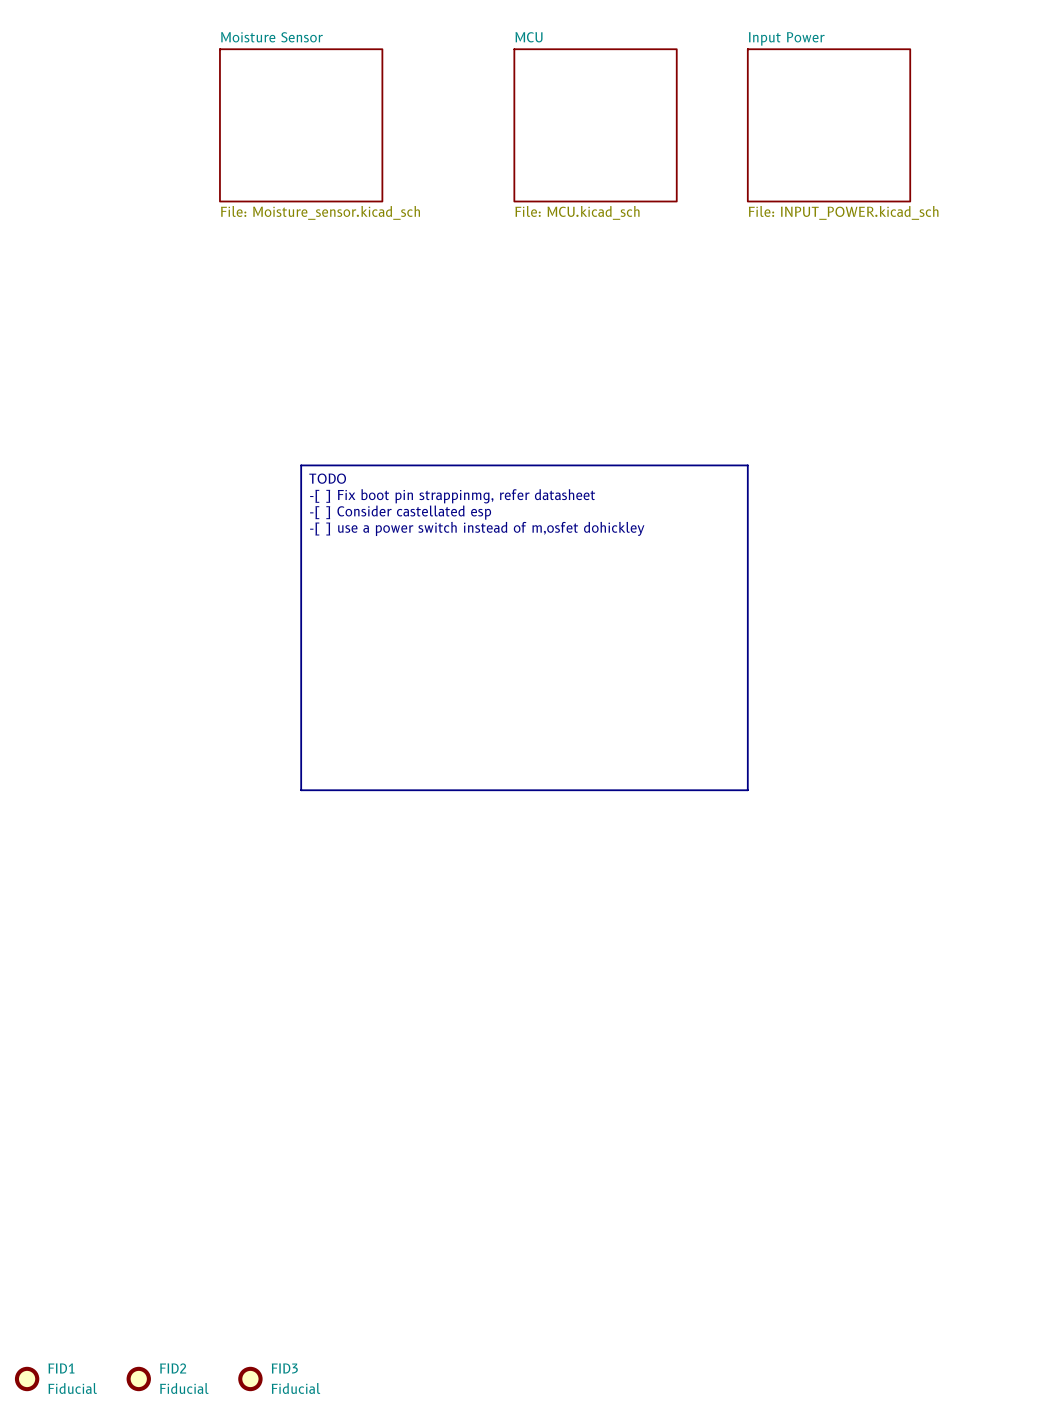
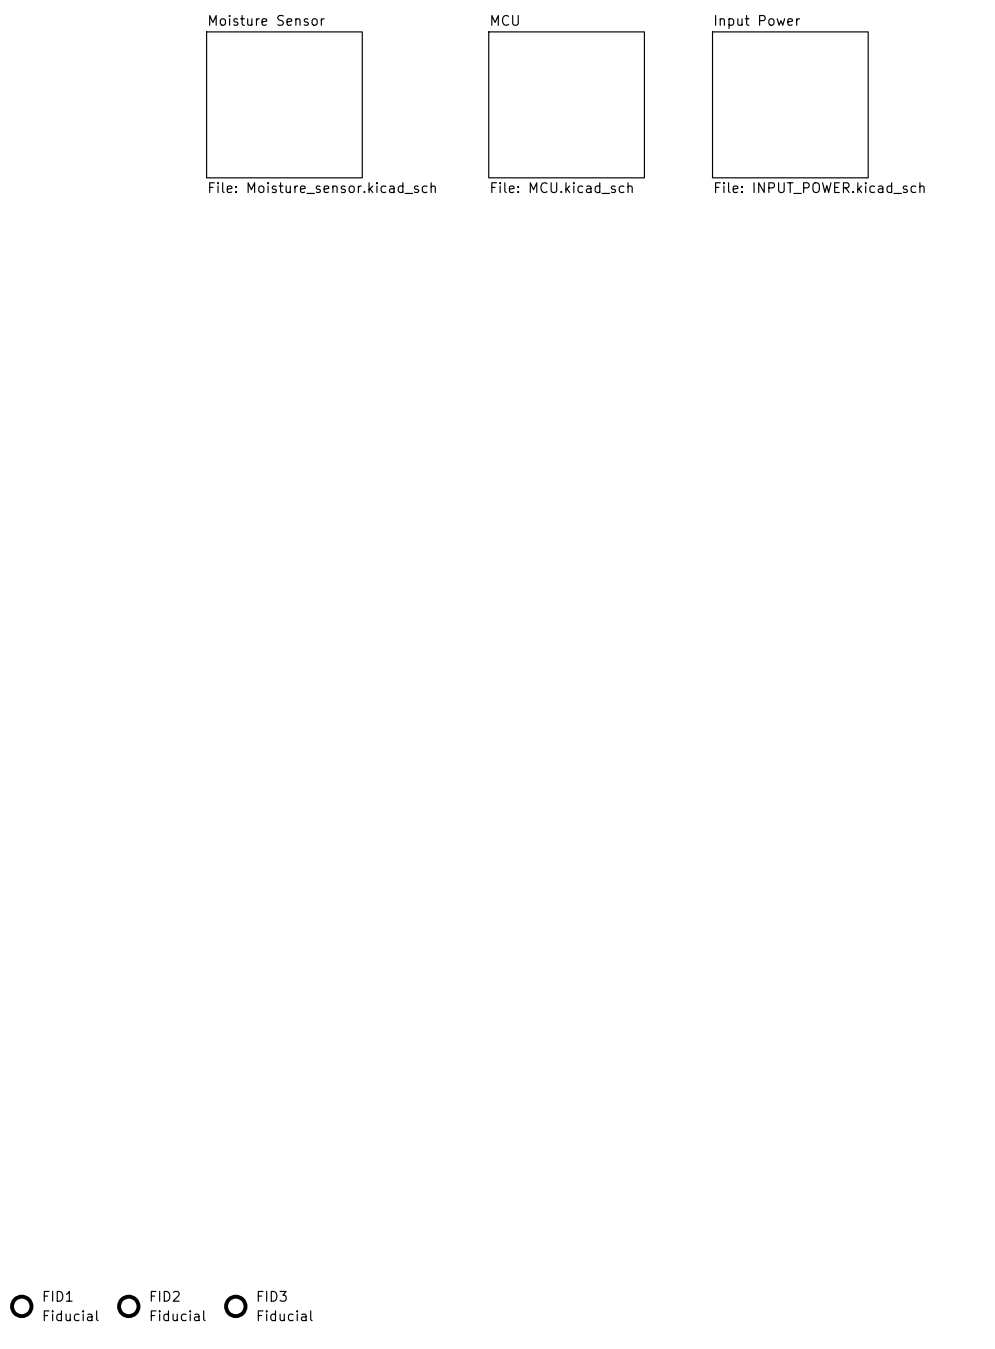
line: (301, 465) (747, 465) (747, 790) (301, 790) (301, 465) -> none
text: TODO (327, 478) -> none
text: -[ ] Fix boot pin strappinmg, refer datasheet (452, 496) -> none
text: -[ ] Consider castellated esp (400, 512) -> none
text: -[ ] use a power switch instead of m,osfet dohickley (477, 528) -> none

